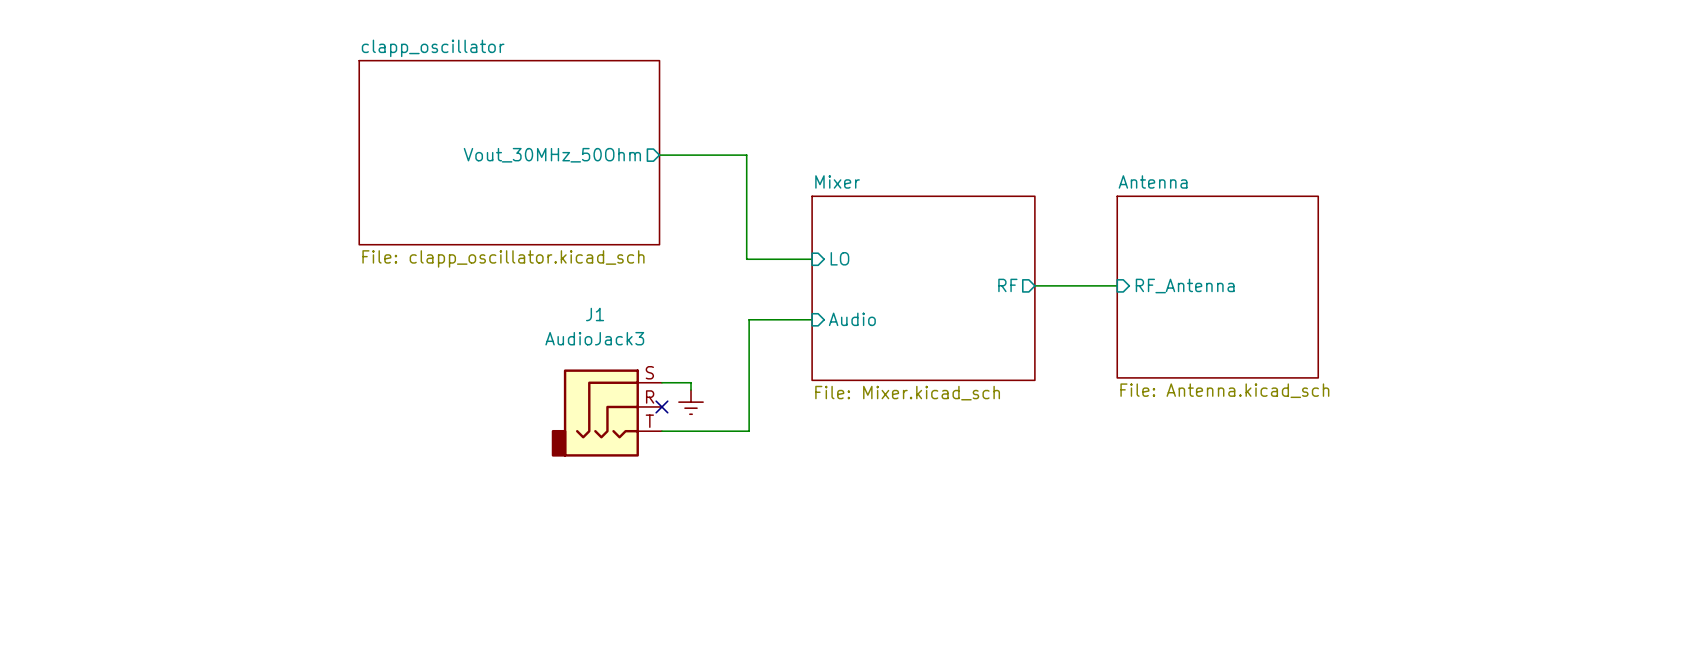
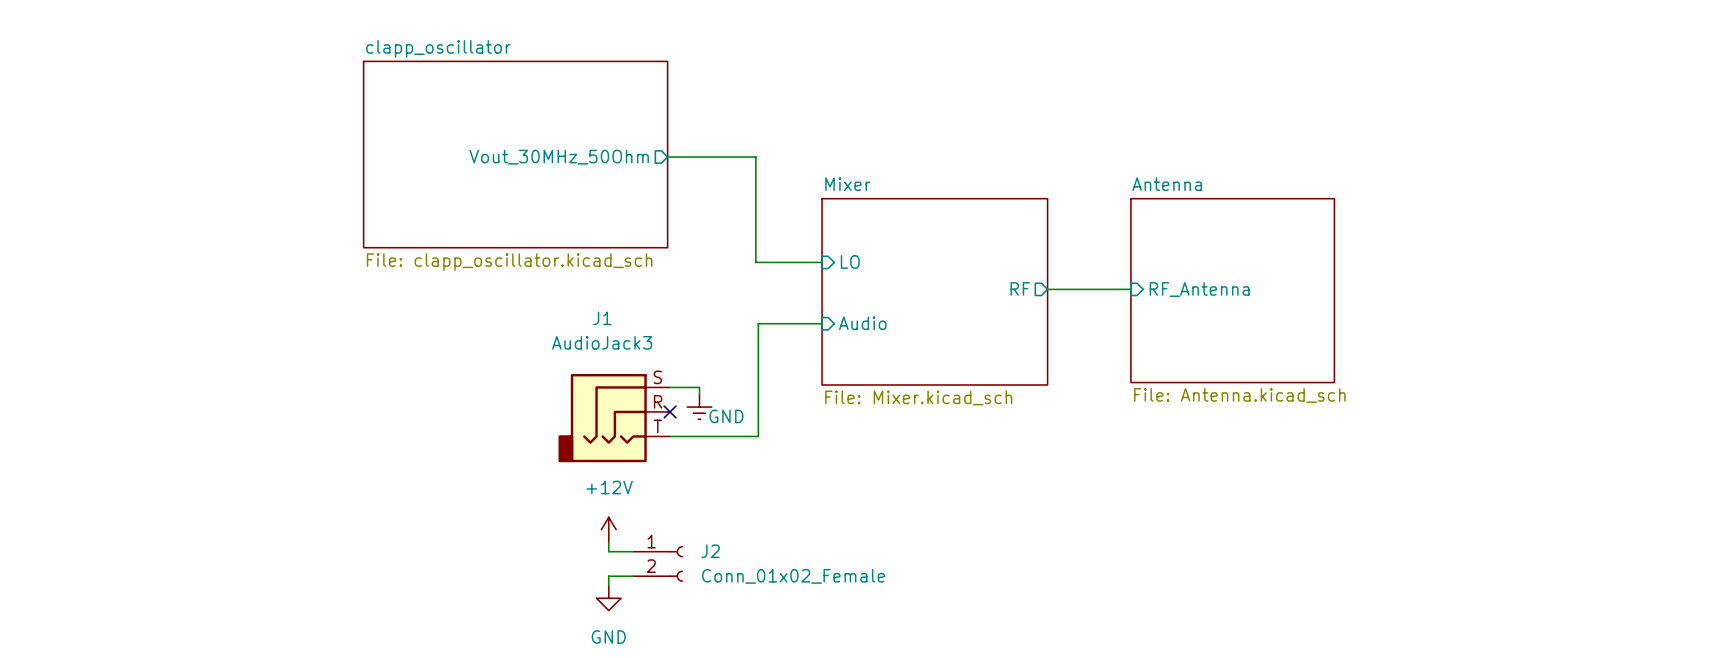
power symbol text: none -> GND (726, 416)
power symbol: none -> +12V (608, 529)
wire: none -> (608, 541) (608, 551) (633, 551)
J2: none -> Conn_01x02_Female (658, 563)
wire: none -> (633, 576) (608, 576) (608, 586)
power symbol: none -> GND (608, 598)

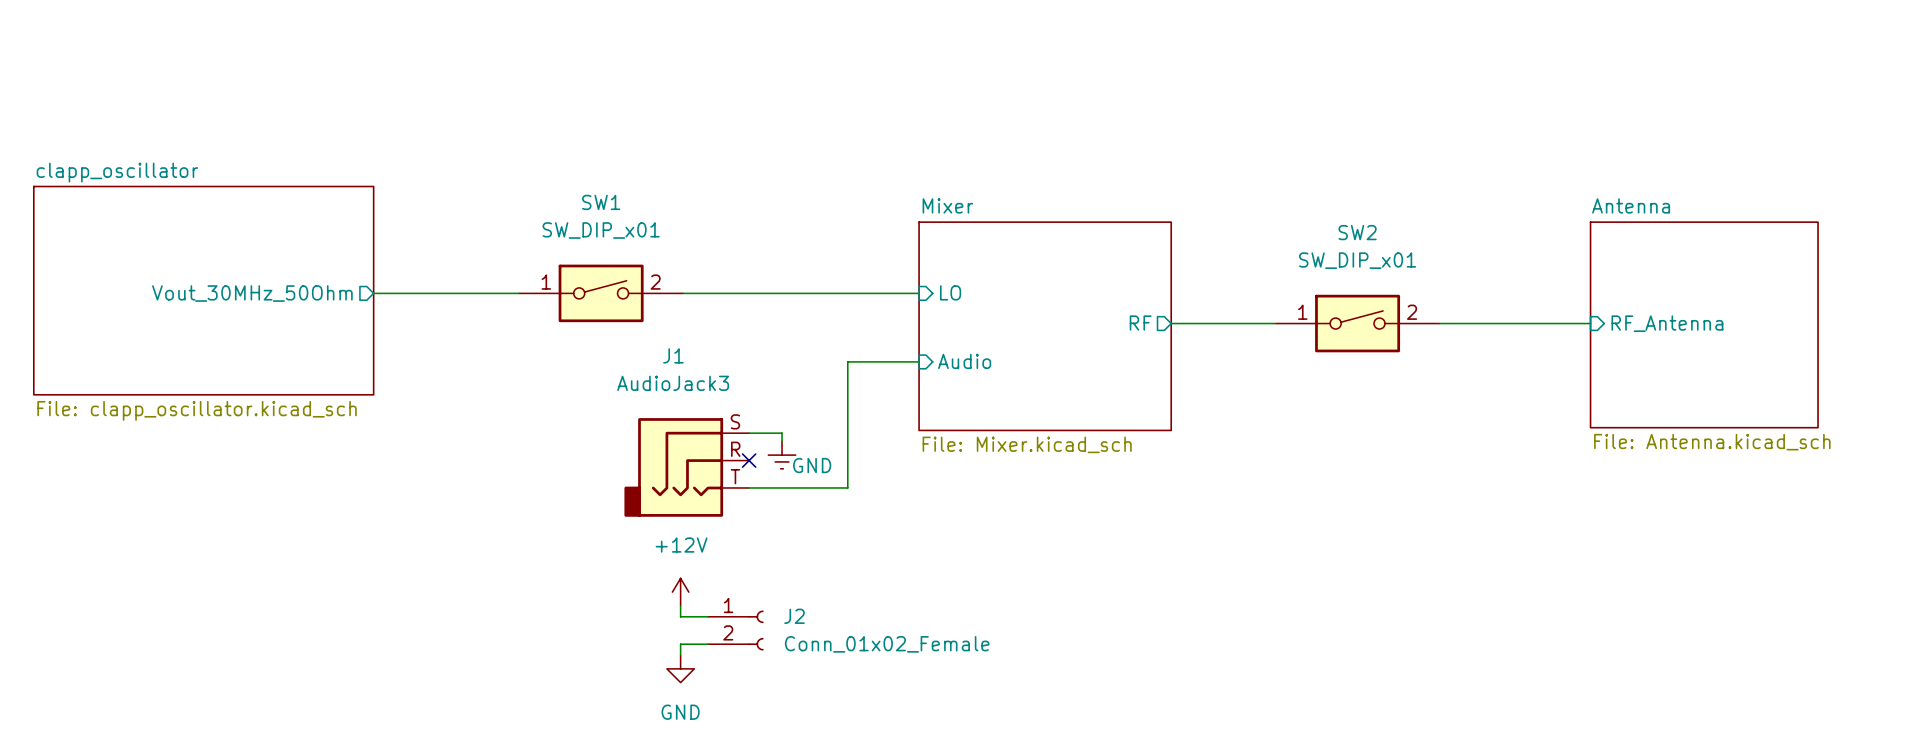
sheet clapp_oscillator: File: clapp_oscillator.kicad_sch (515, 154) -> none
sheet pin: Vout_30MHz_50Ohm (559, 157) -> none
wire: (667, 157) (755, 157) (755, 262) -> (683, 293) (845, 293)
sheet clapp_oscillator: none -> File: clapp_oscillator.kicad_sch (203, 290)
sheet pin: none -> Vout_30MHz_50Ohm (252, 293)
wire: none -> (373, 293) (518, 293)
SW1: none -> SW_DIP_x01 (601, 293)
wire: none -> (1264, 323) (1275, 323)
sheet pin: RF_Antenna (1199, 289) -> none
SW2: none -> SW_DIP_x01 (1357, 323)
wire: none -> (1439, 323) (1590, 323)
sheet pin: none -> RF_Antenna (1667, 323)
sheet Antenna: File: Antenna.kicad_sch (1232, 290) -> none
sheet Antenna: none -> File: Antenna.kicad_sch (1704, 324)

